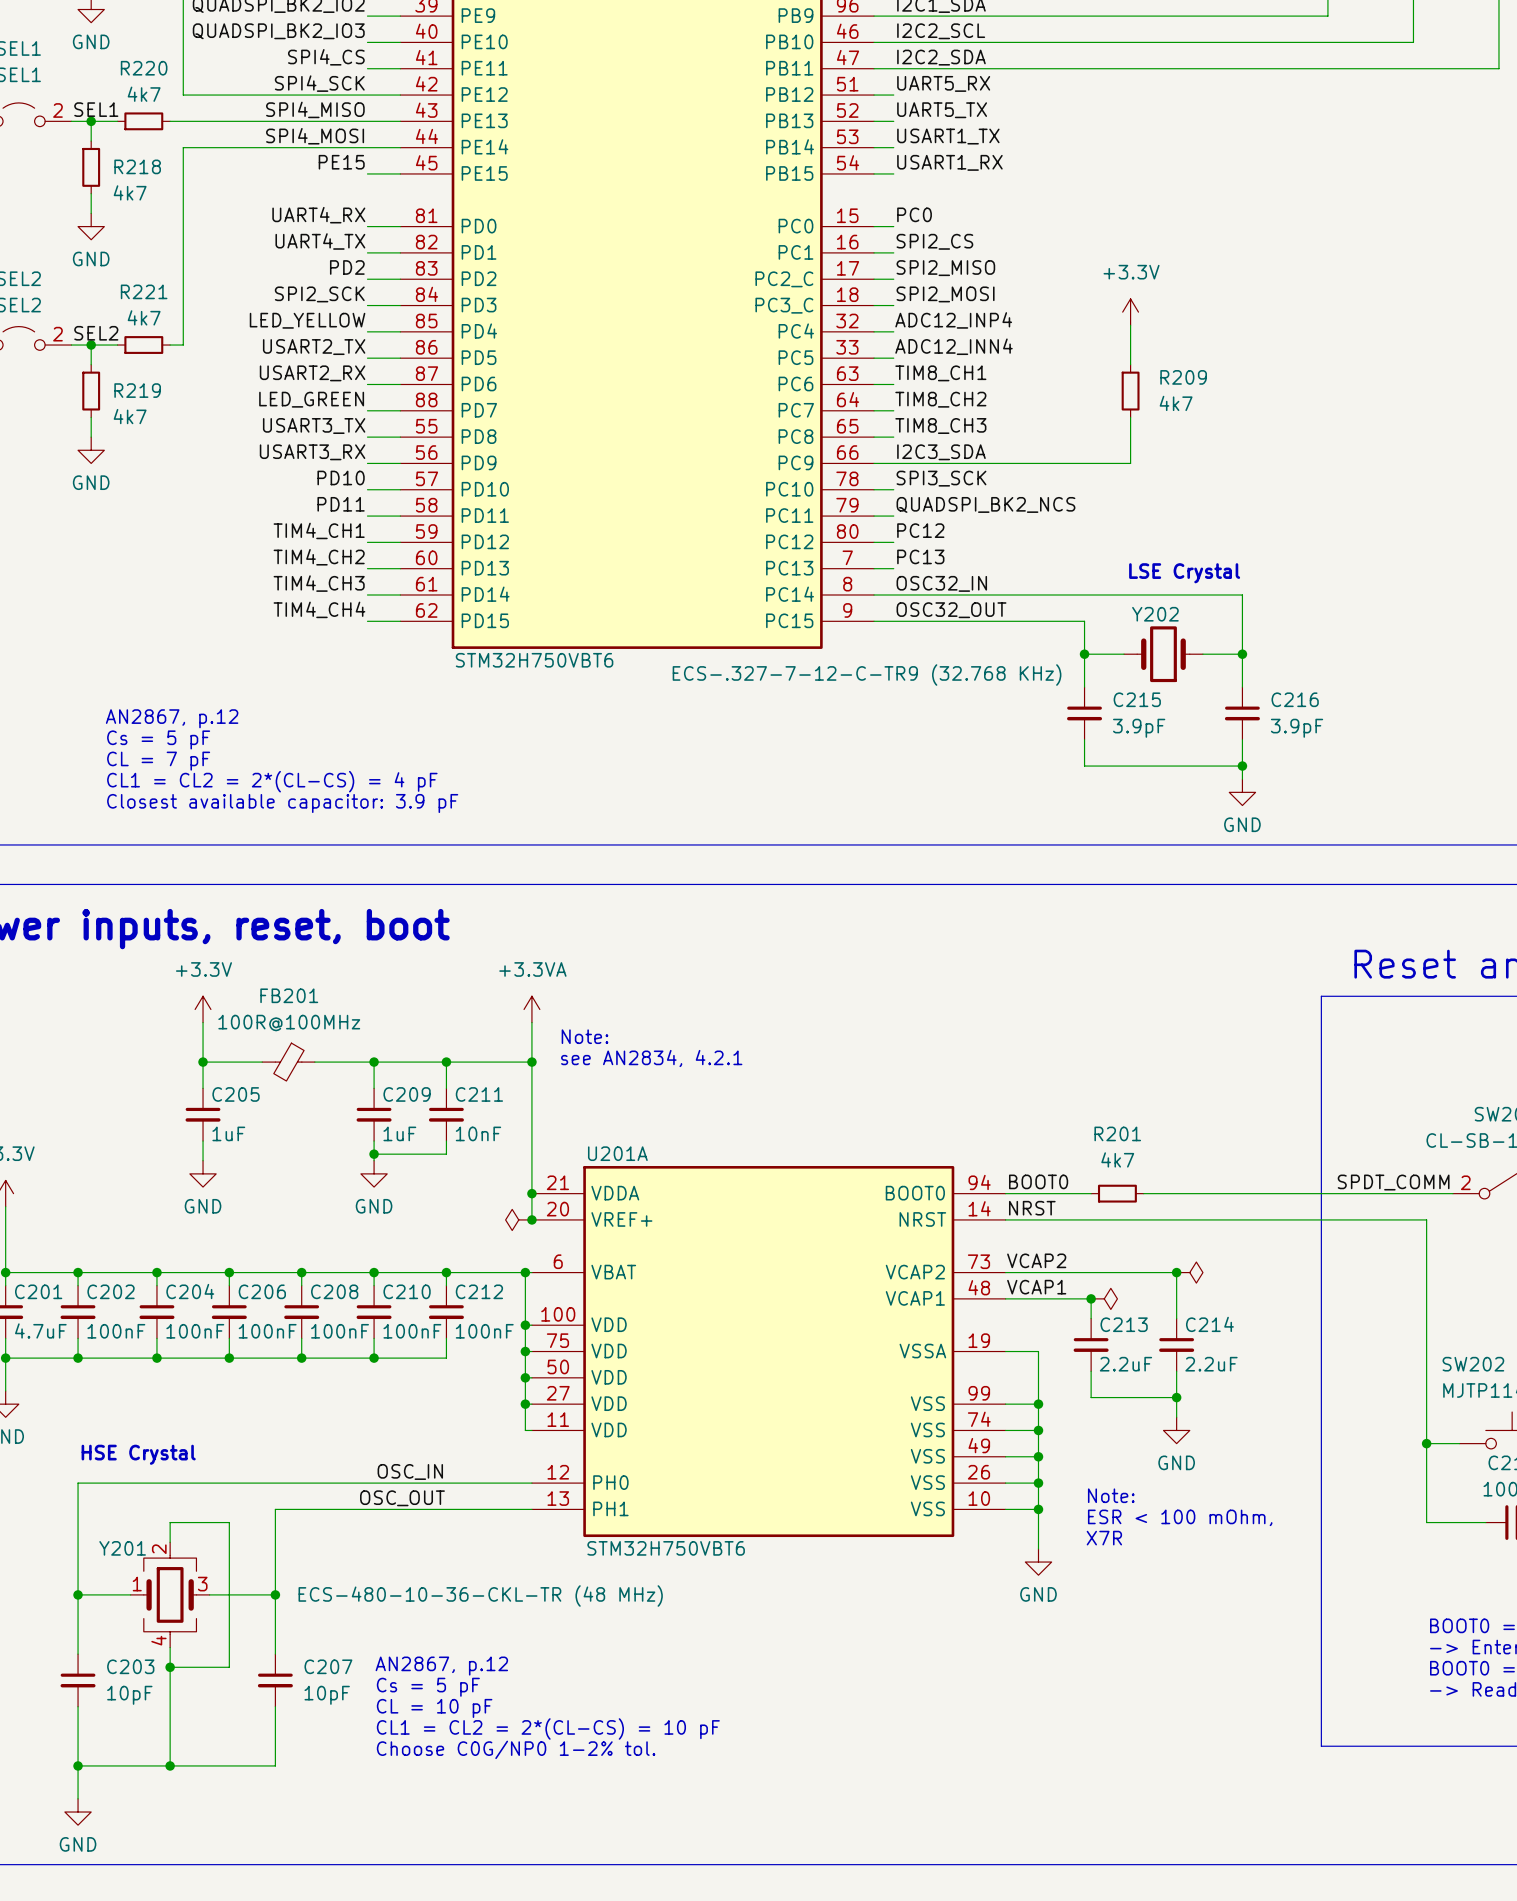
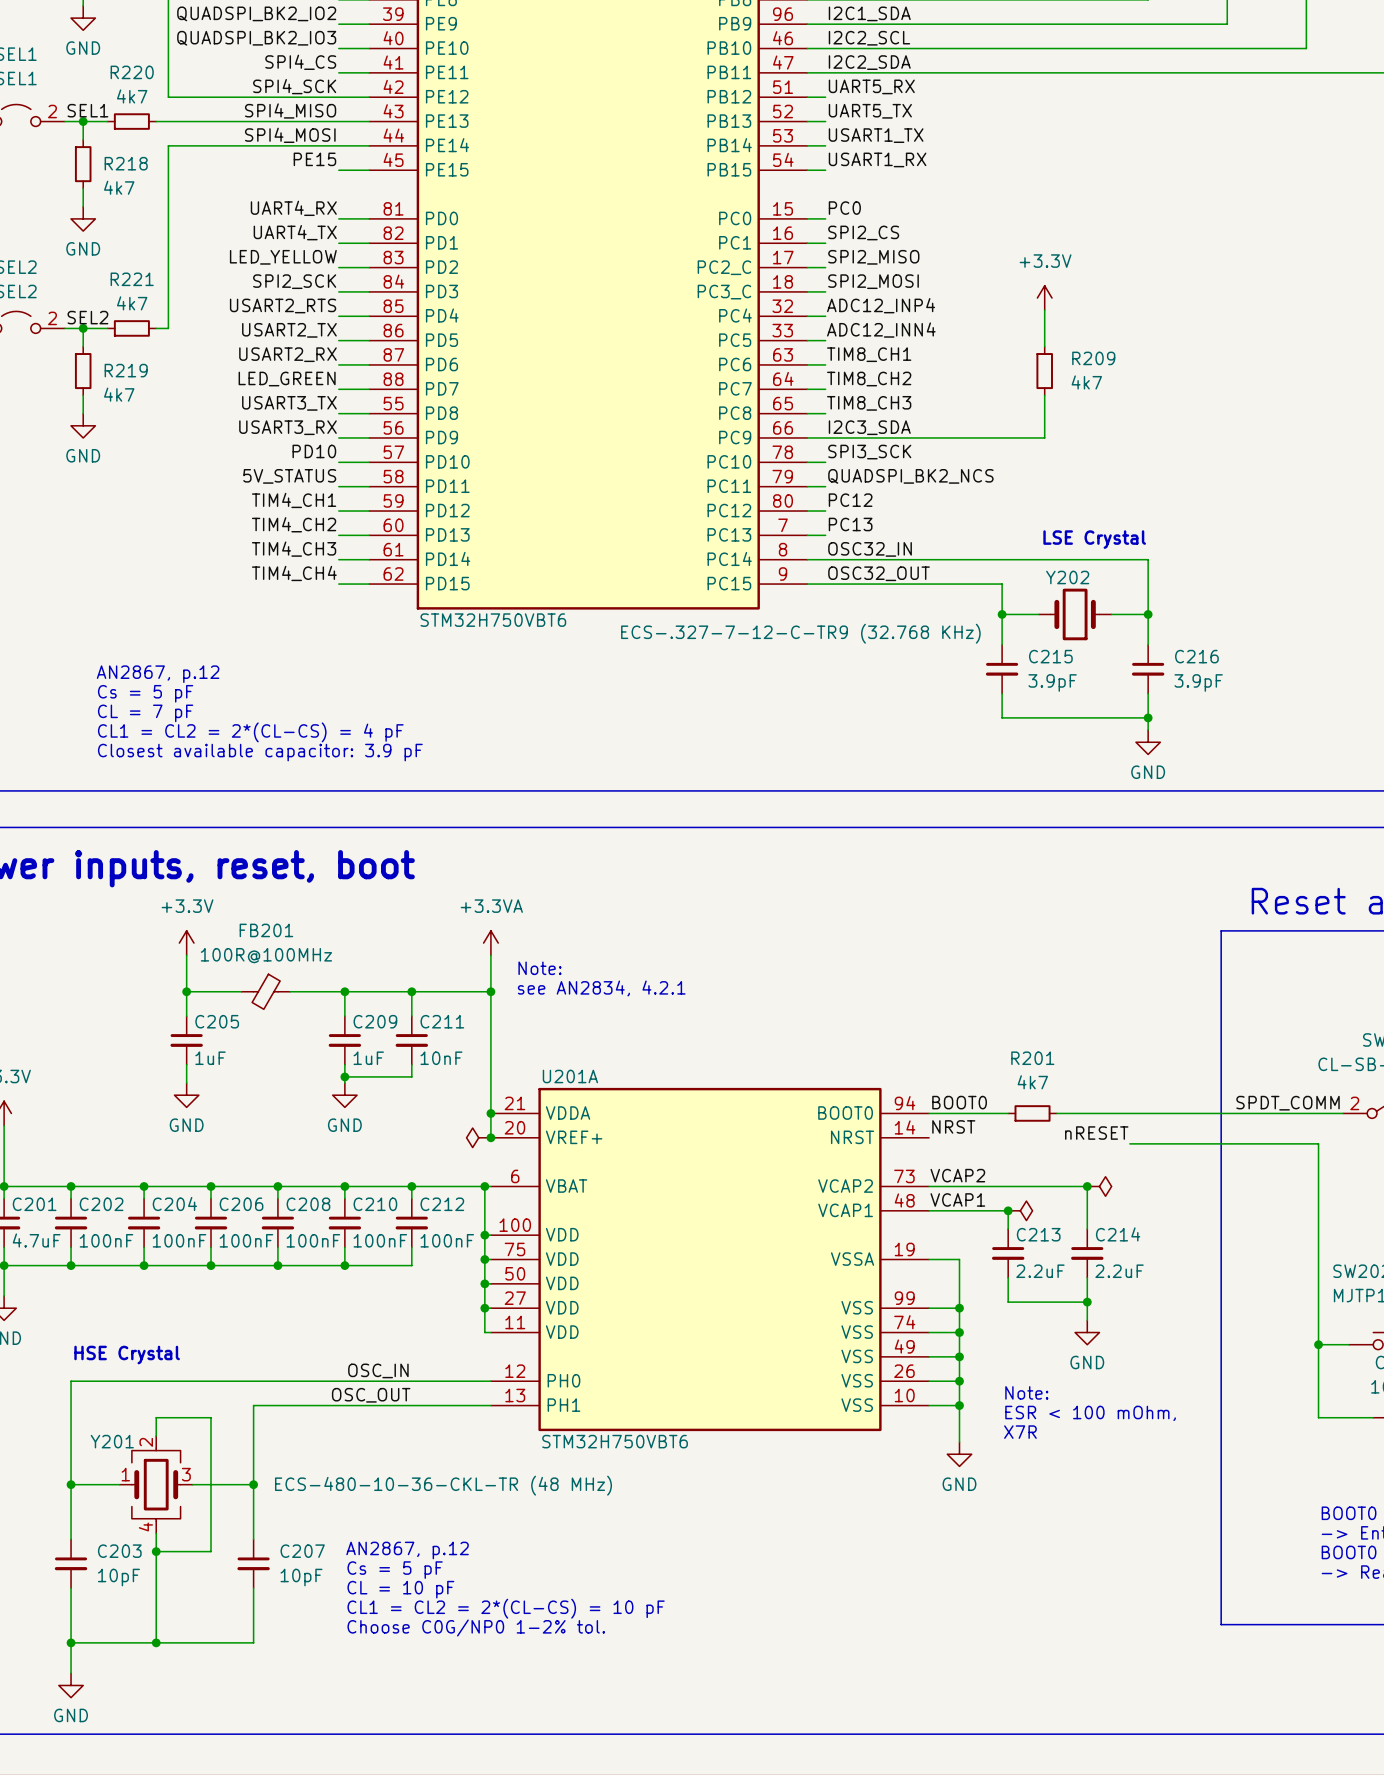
label: PD2 (347, 267) -> LED_YELLOW (283, 257)
label: LED_YELLOW (307, 320) -> USART2_RTS (283, 306)
label: PD11 (341, 504) -> 5V_STATUS (289, 476)
label: none -> nRESET (1096, 1133)
wire: (1005, 1219) (1426, 1219) (1426, 1226) -> (1129, 1143) (1318, 1143)

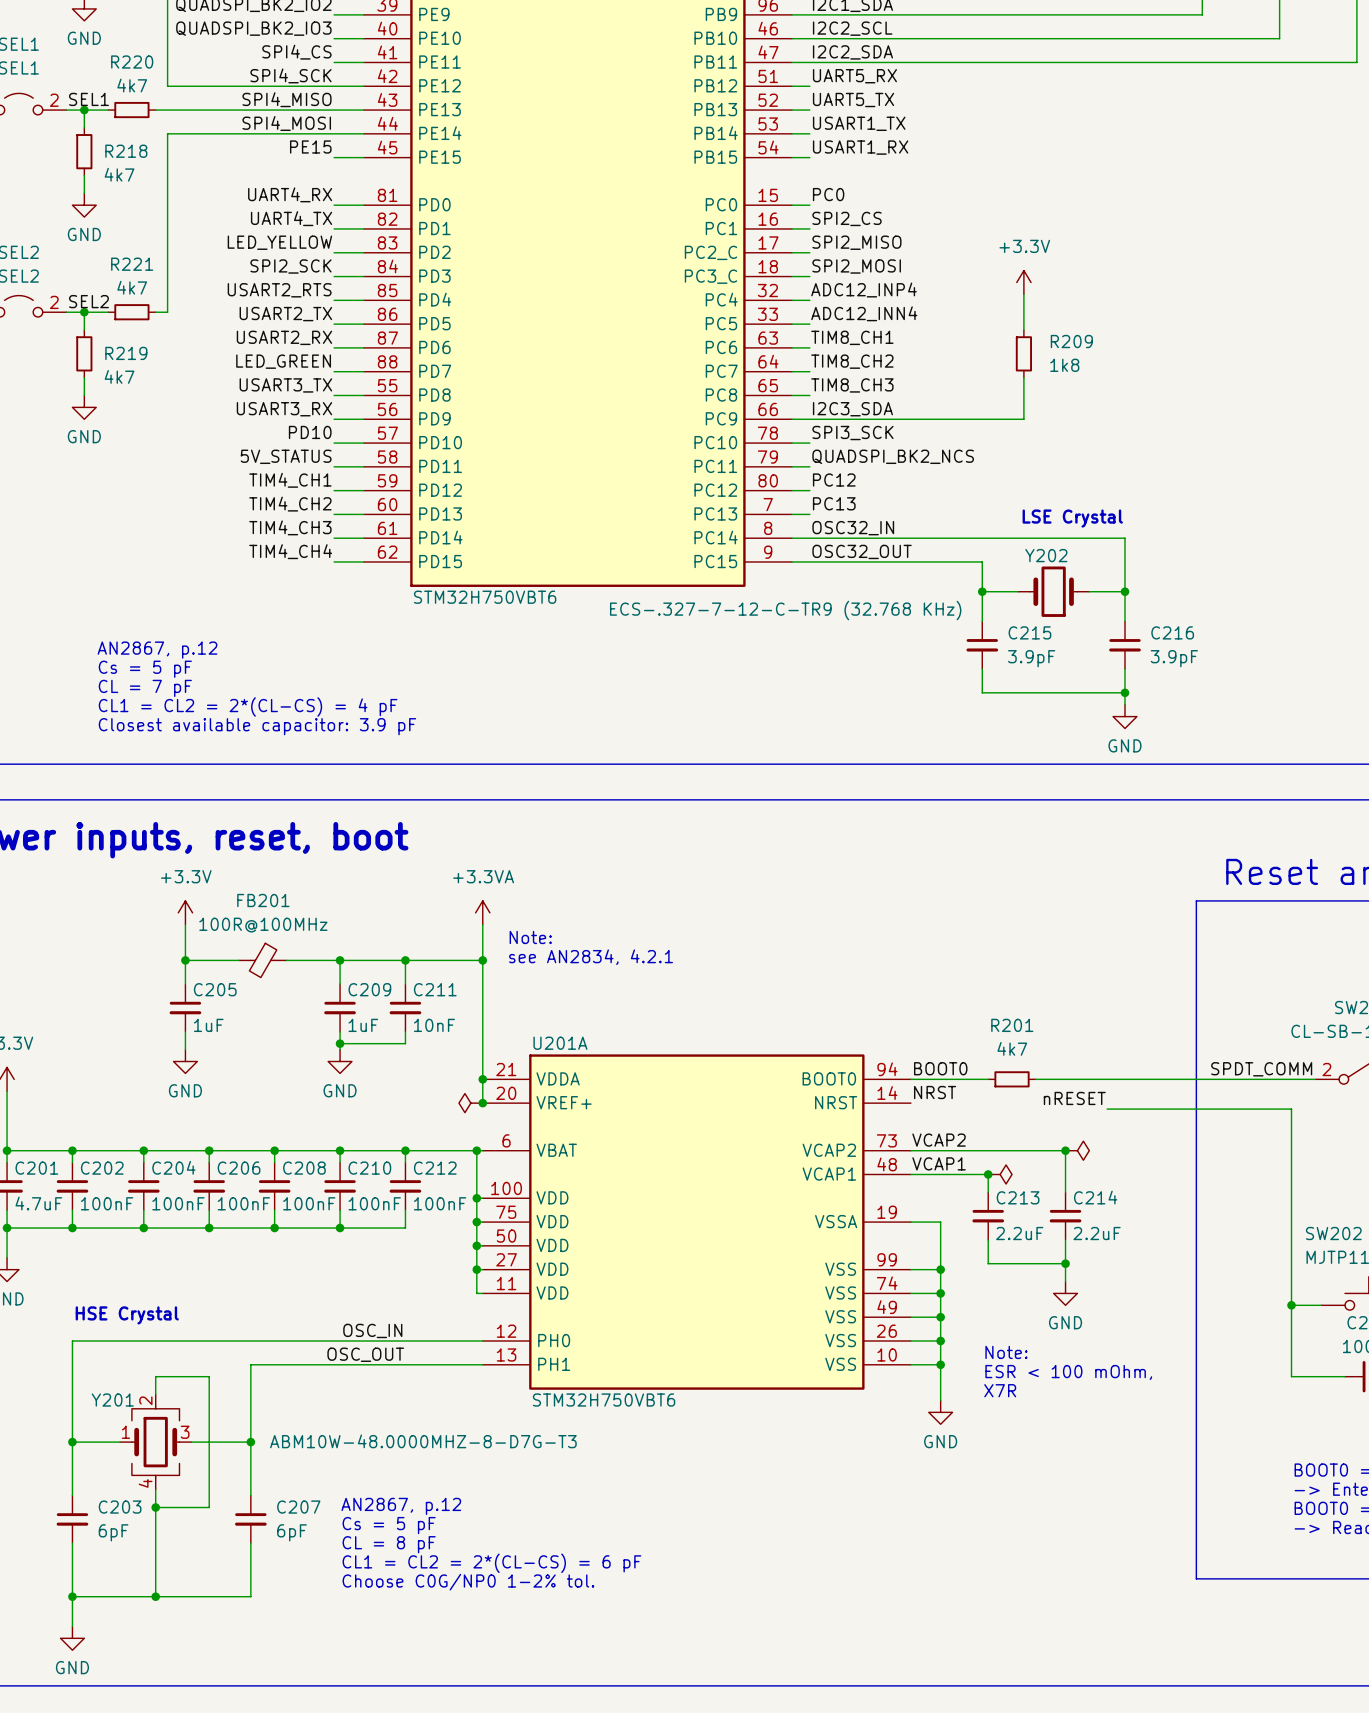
R209 value: 4k7 (1086, 382) -> 1k8 (1064, 365)
Y201 value: ECS-480-10-36-CKL-TR (48 MHz) (443, 1485) -> ABM10W-48.0000MHZ-8-D7G-T3 (423, 1441)
C203 value: 10pF (118, 1577) -> 6pF (113, 1532)
C207 value: 10pF (301, 1577) -> 6pF (291, 1532)
text: CL = 10 pF (400, 1589) -> CL = 8 pF (389, 1544)
text: CL1 = CL2 = 2*(CL-CS) = 10 pF (506, 1608) -> CL1 = CL2 = 2*(CL-CS) = 6 pF (491, 1563)

